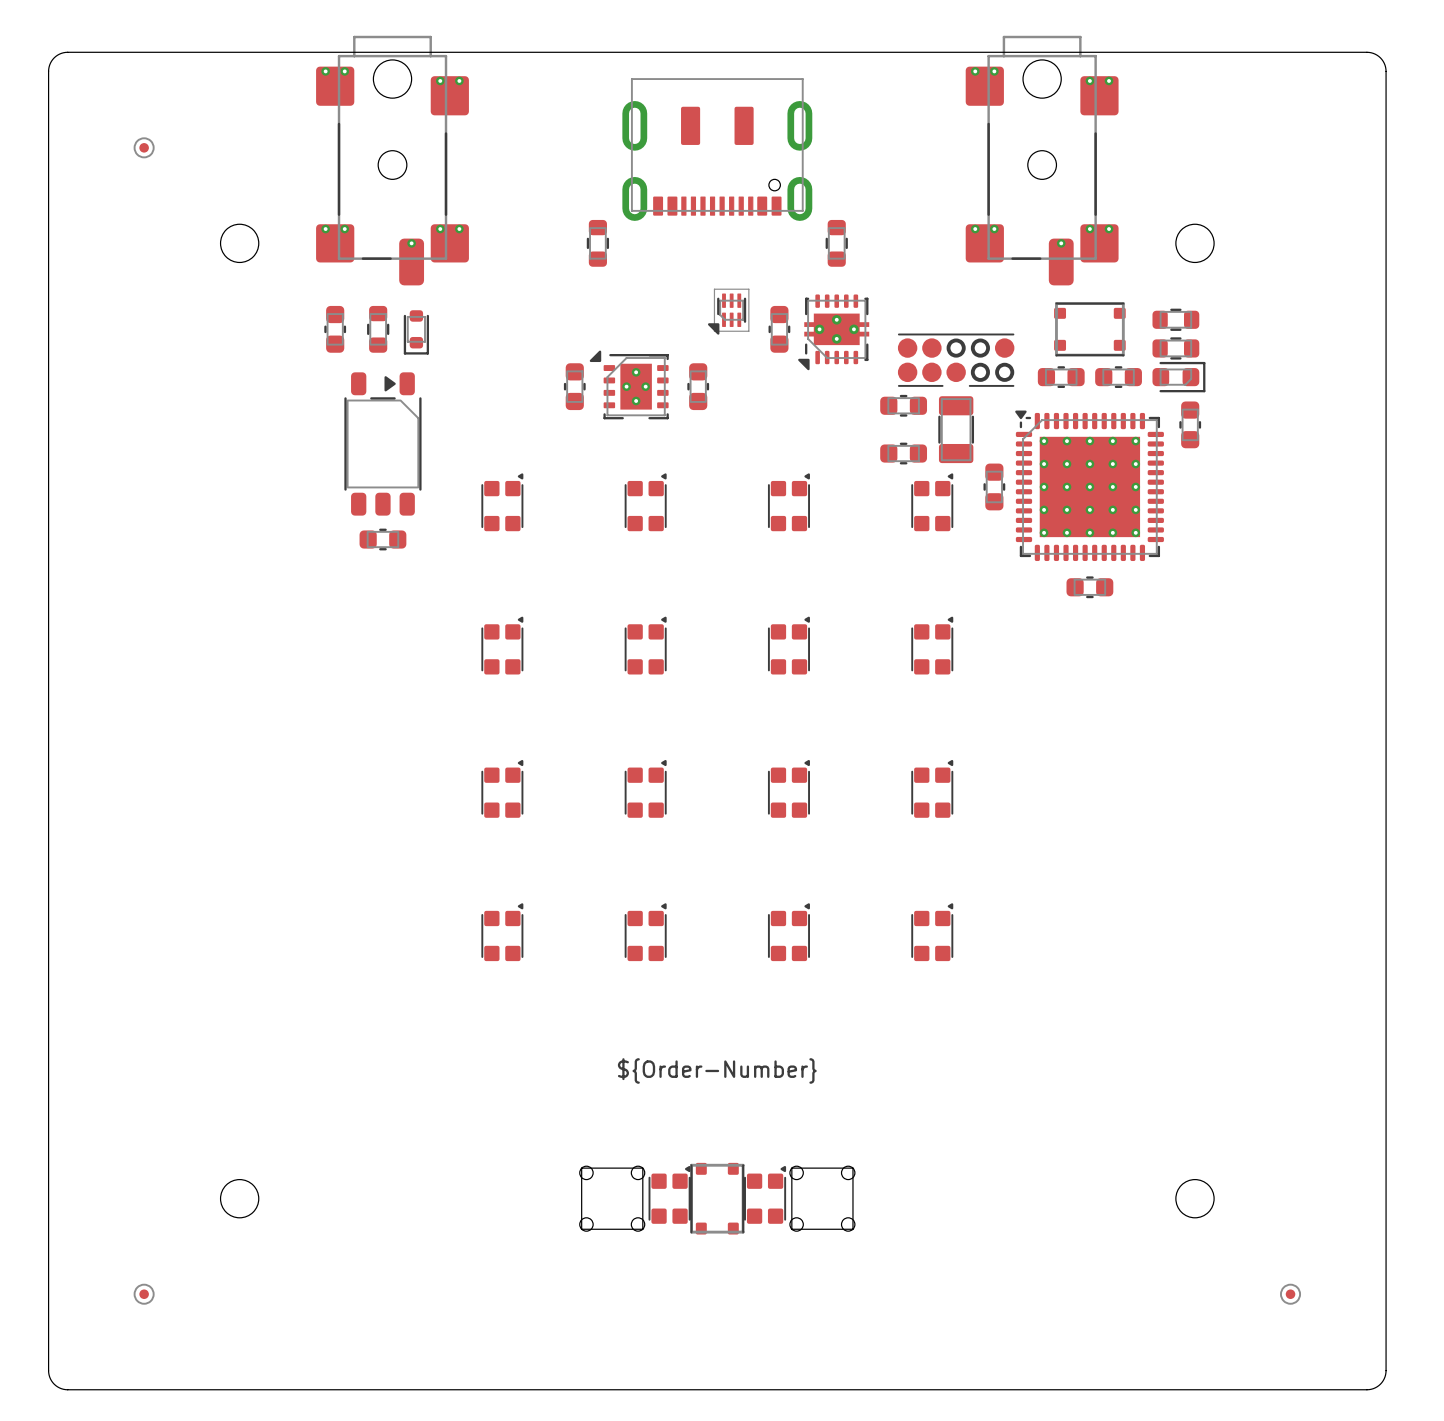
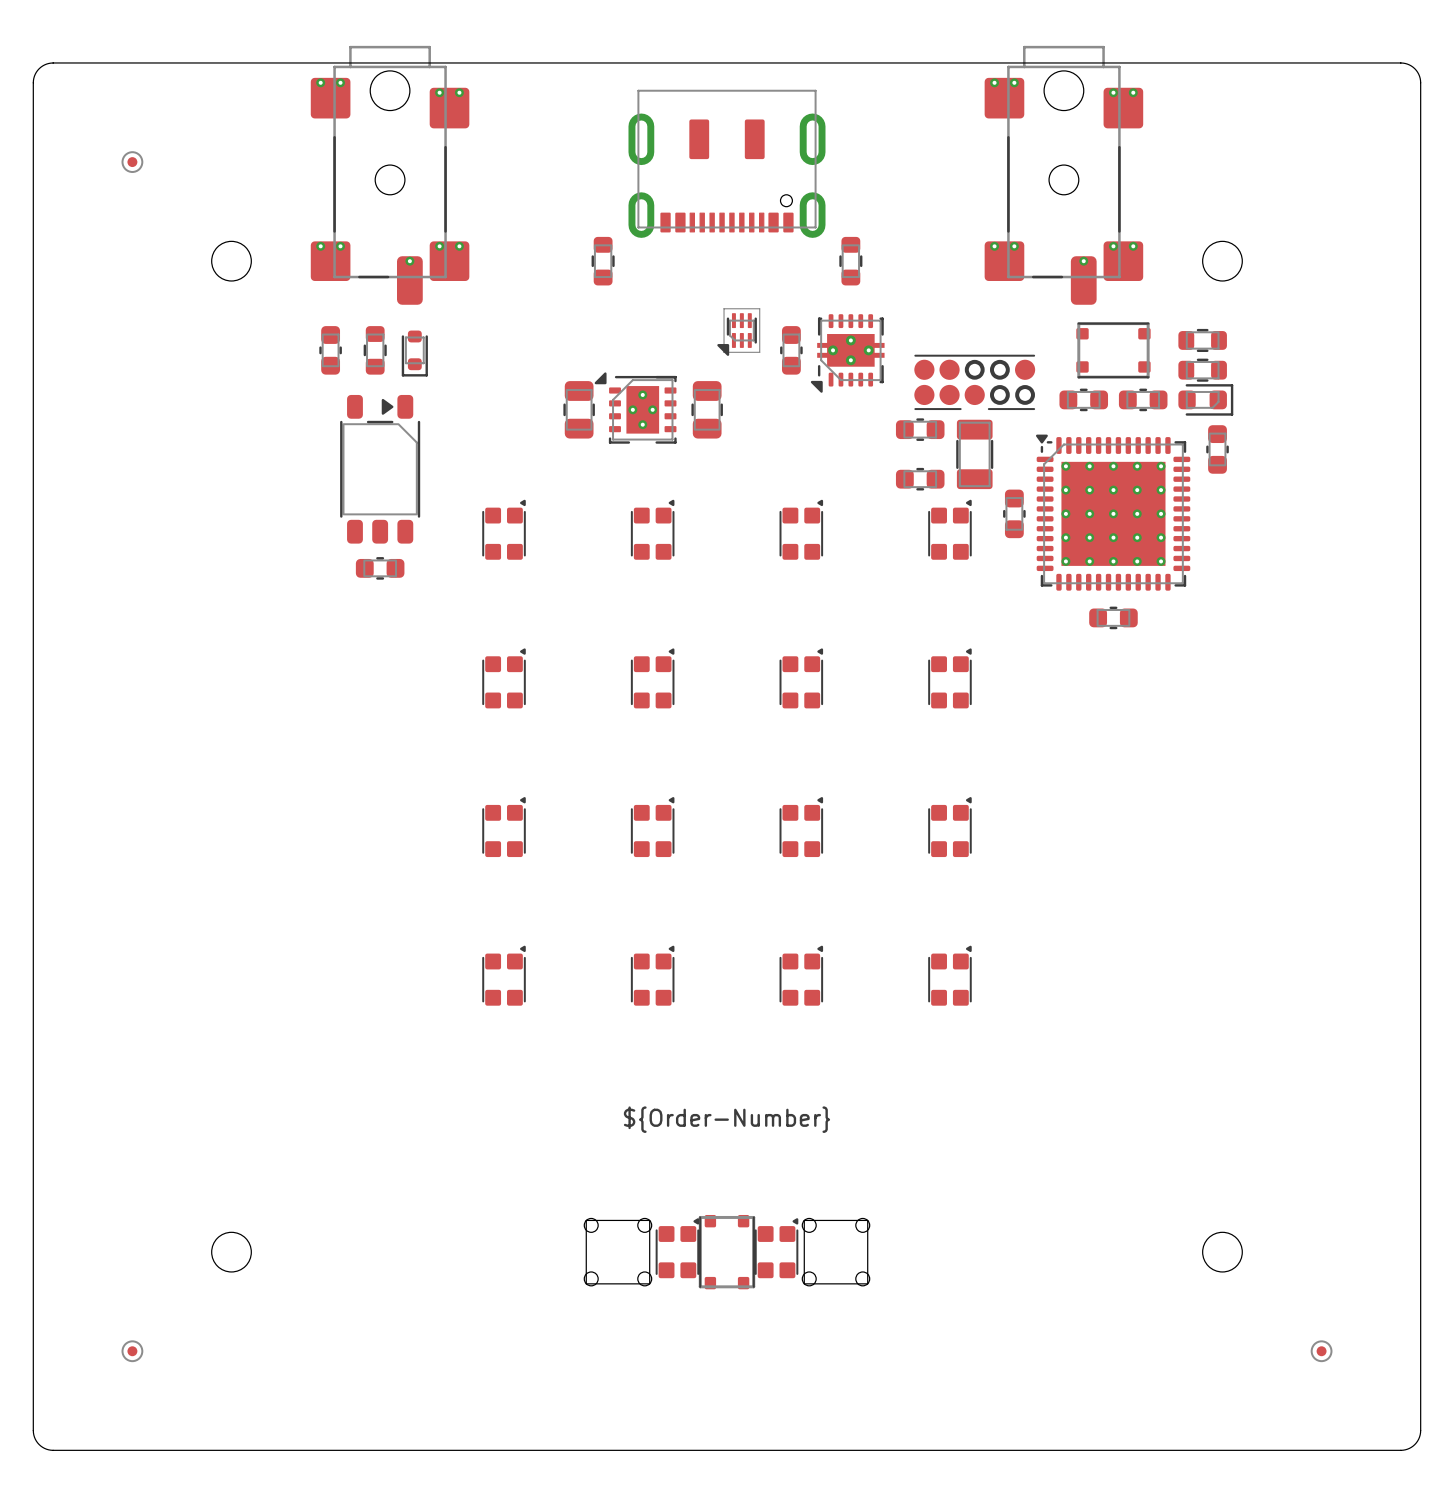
part footprint: [563, 363, 586, 411] -> [563, 381, 595, 439]
part footprint: [687, 363, 710, 411] -> [691, 381, 723, 439]

